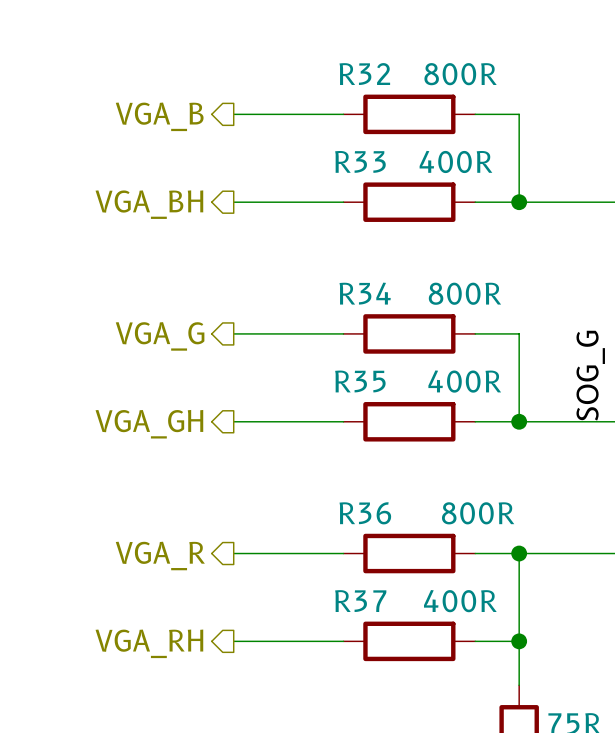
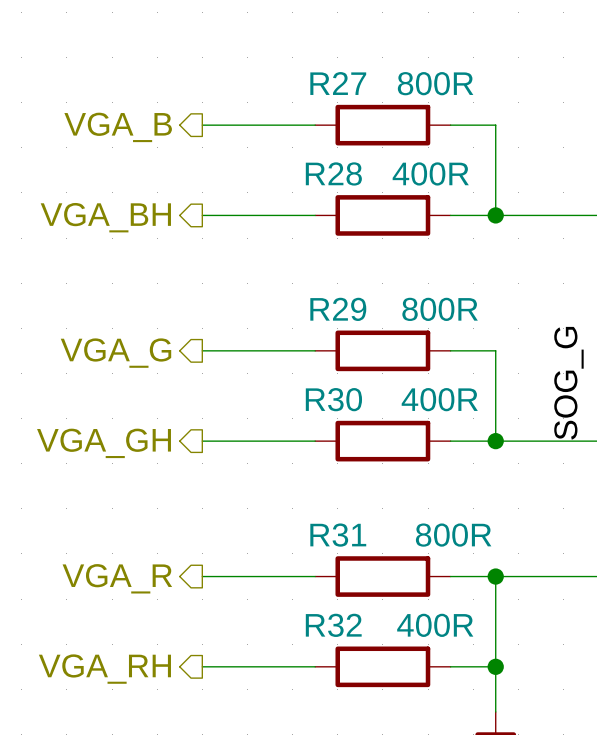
R32 name: R32 (364, 74) -> R27 (338, 83)
R33 name: R33 (360, 161) -> R28 (333, 173)
R34 name: R34 (365, 293) -> R29 (338, 309)
R35 name: R35 (360, 381) -> R30 (333, 399)
R36 name: R36 (365, 513) -> R31 (338, 535)
R37 name: R37 (360, 601) -> R32 (333, 625)

